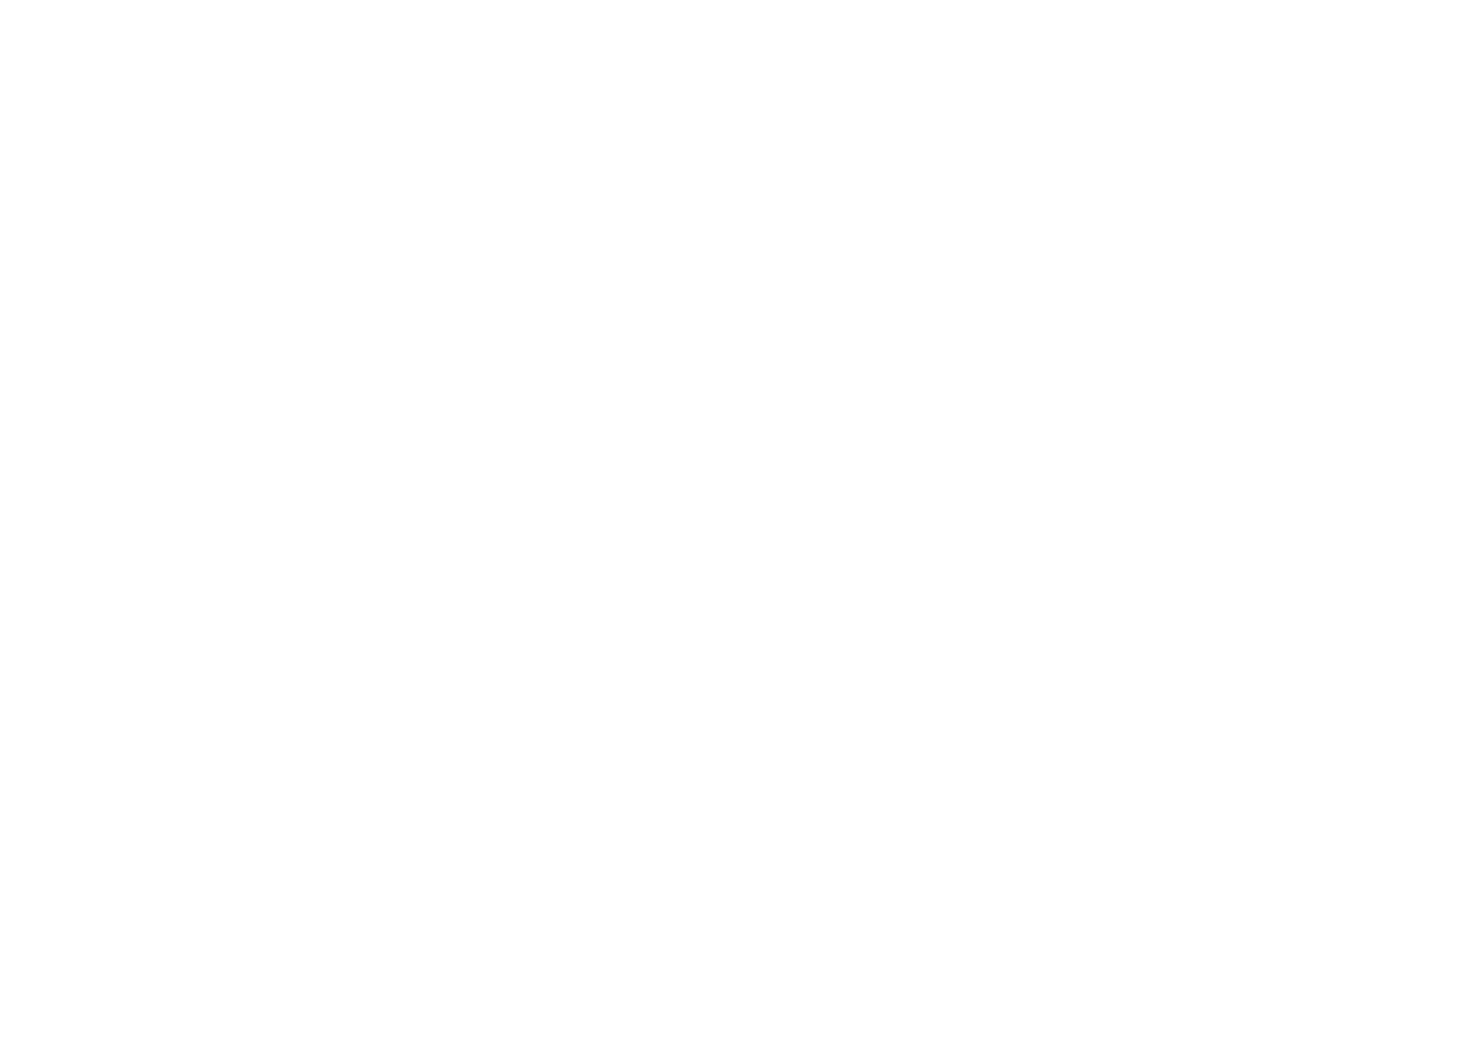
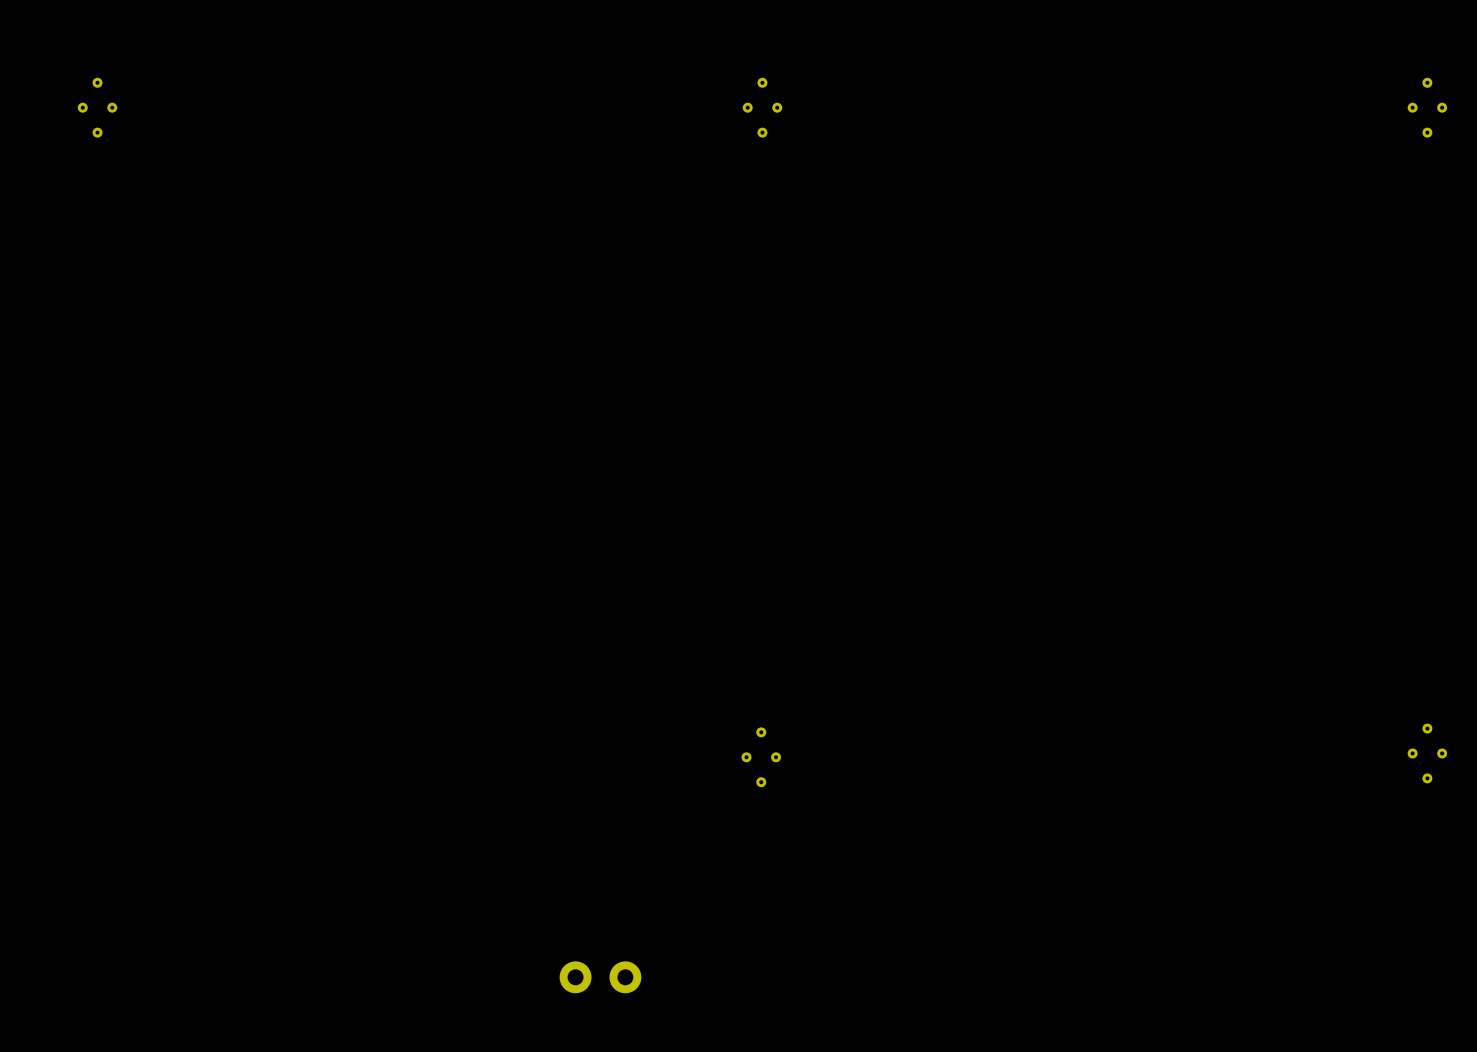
part: none -> (97, 107)
part: none -> (762, 107)
part: none -> (1427, 107)
part: none -> (1427, 753)
part: none -> (761, 757)
part: none -> (600, 977)

